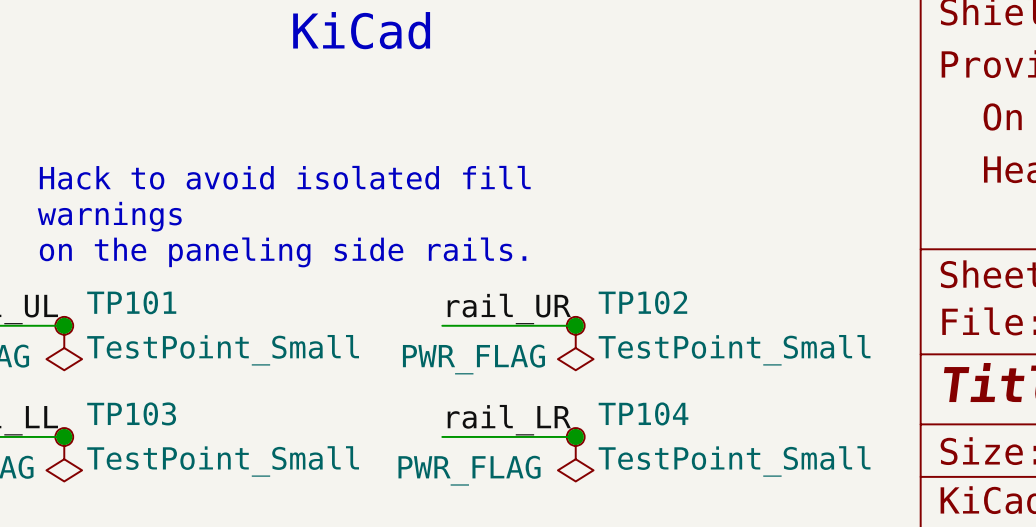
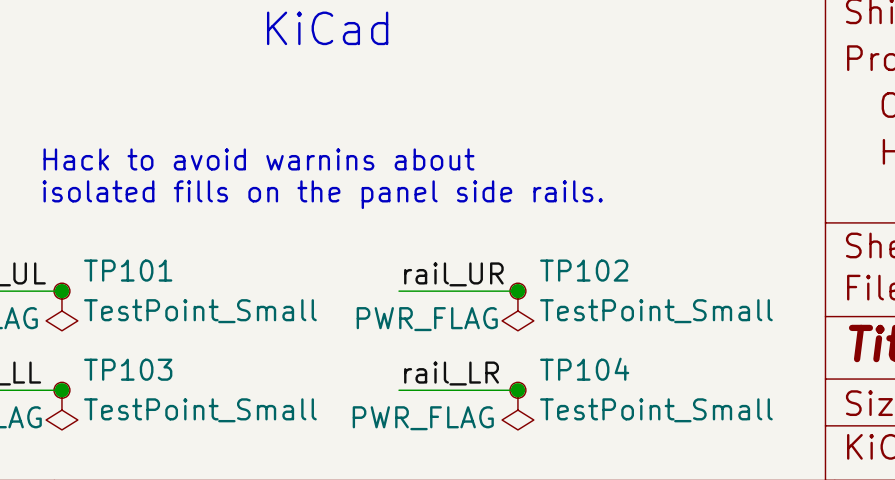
text: Hack to avoid isolated fill (285, 177) -> Hack to avoid warnins about (258, 159)
text: warnings (109, 216) -> isolated fills on the panel side rails. (322, 194)
text: on the paneling side rails. (283, 252) -> none

